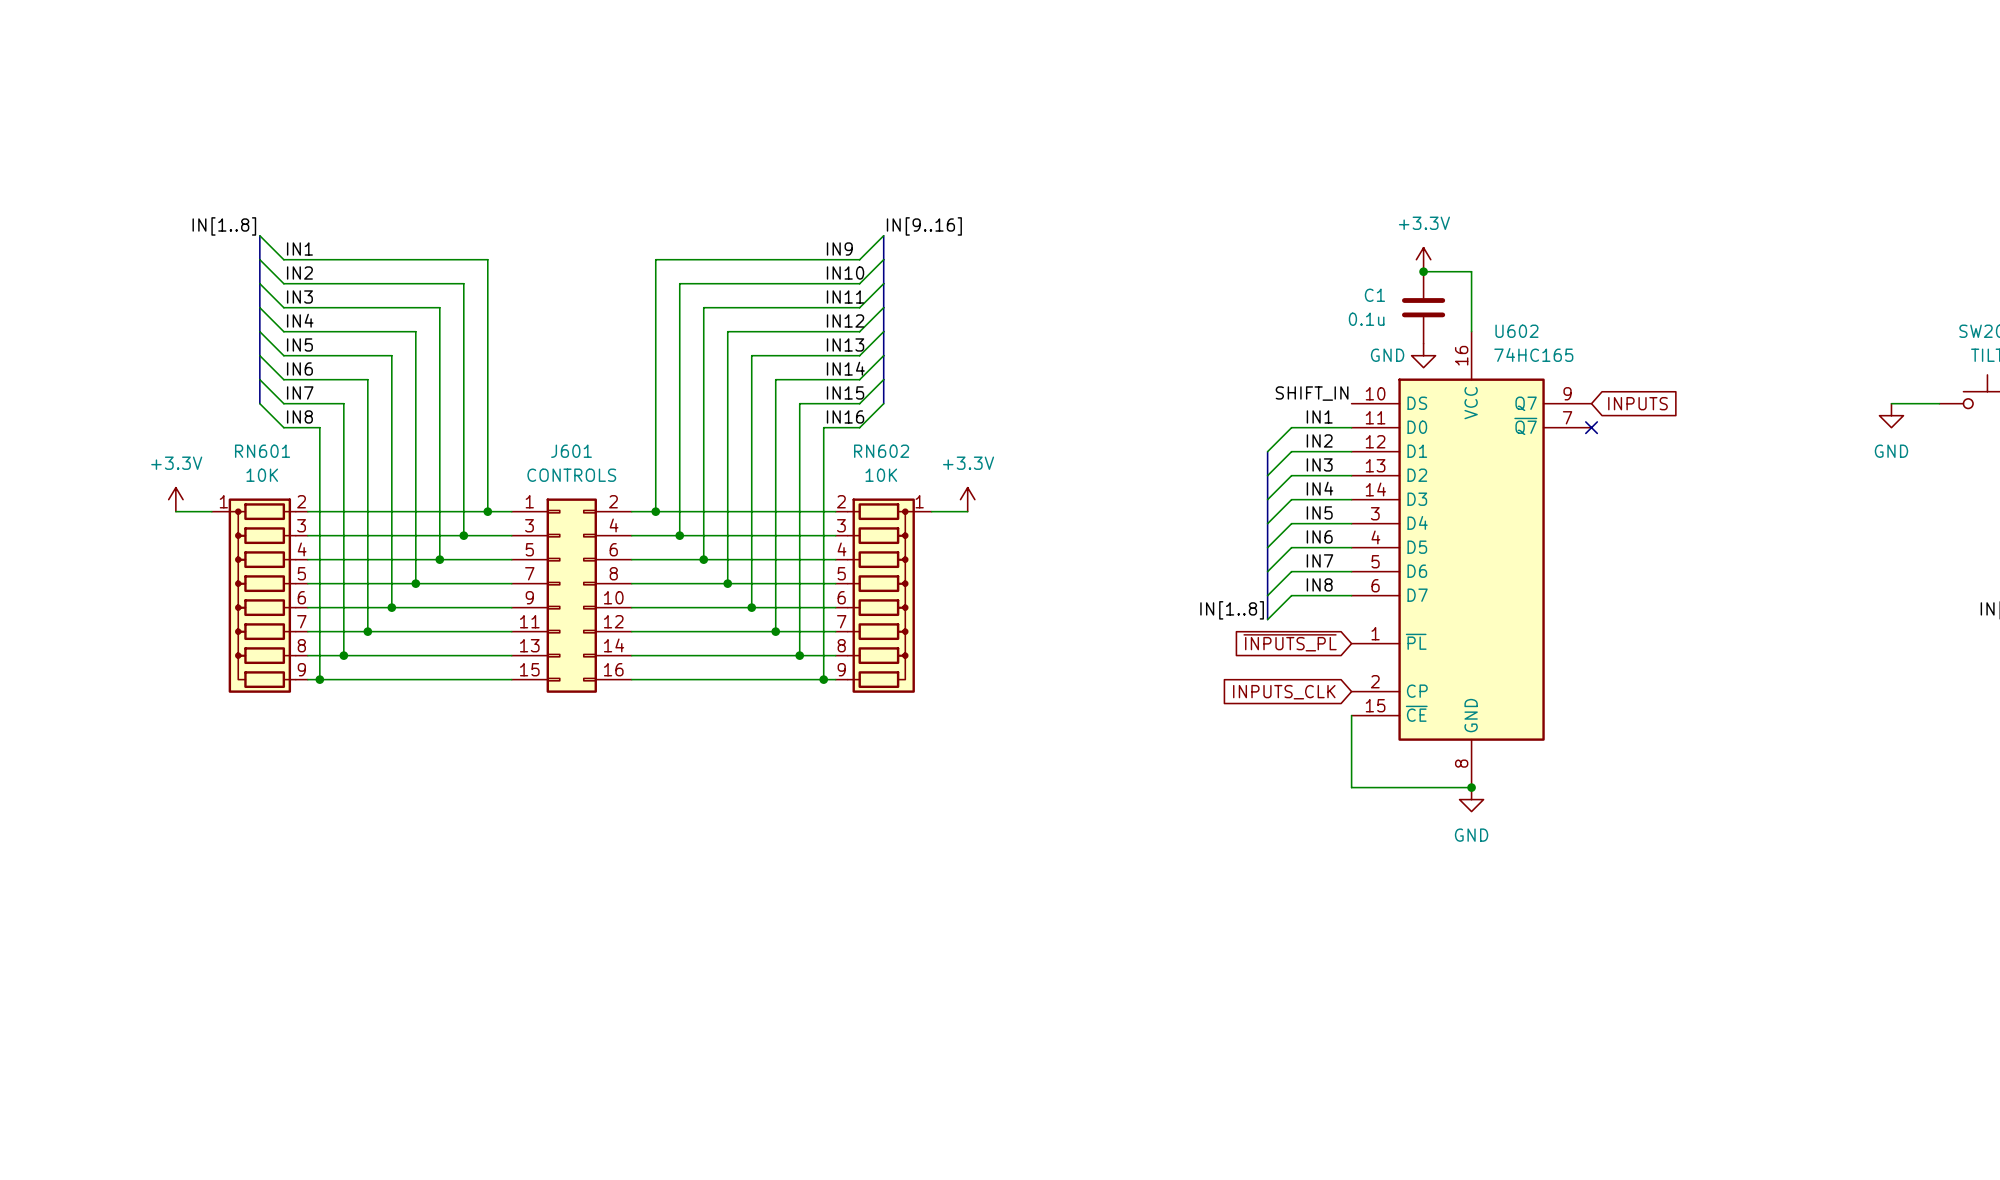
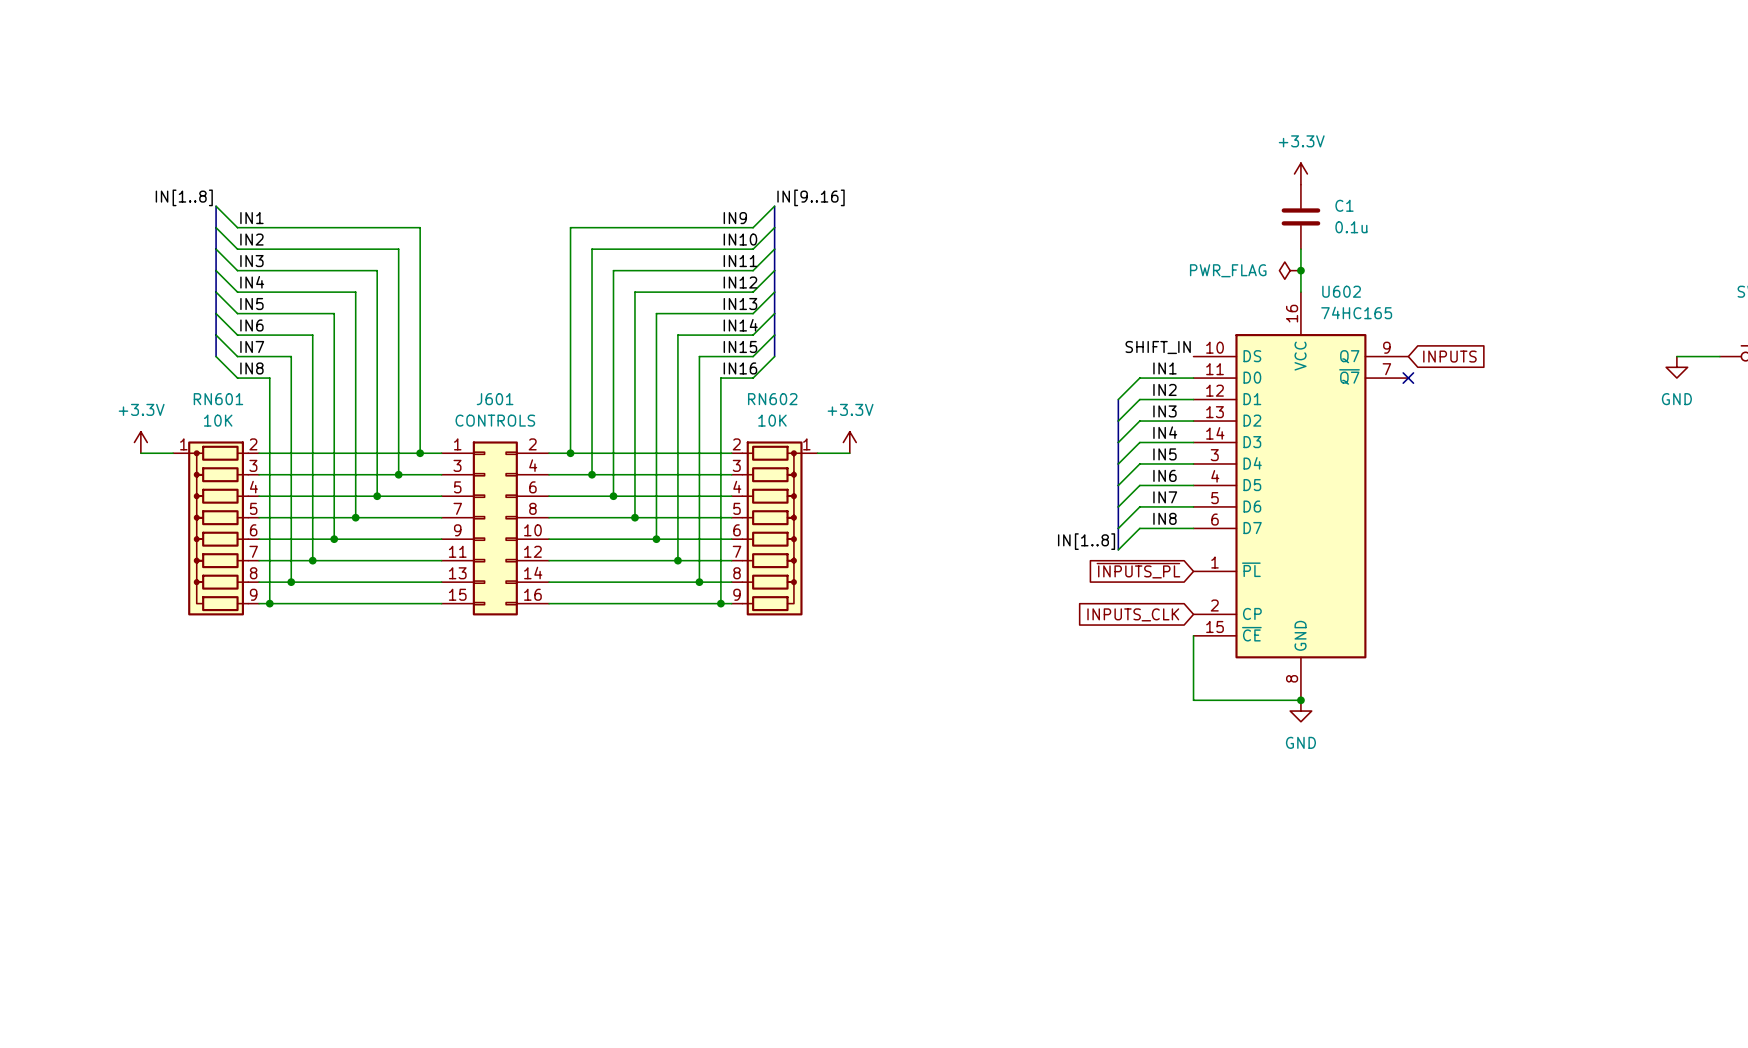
power symbol position: +3.3V (1423, 259) -> +3.3V (1300, 173)
wire: (1423, 271) (1471, 271) (1471, 283) -> none
junction: (1423, 271) -> none
C1 name position: C1 (1374, 295) -> C1 (1344, 205)
C1 position: (1423, 307) -> (1300, 216)
power symbol: none -> PWR_FLAG (1290, 270)
junction: none -> (1300, 270)
C1 value position: 0.1u (1366, 319) -> 0.1u (1351, 227)
power symbol: GND (1423, 355) -> none

